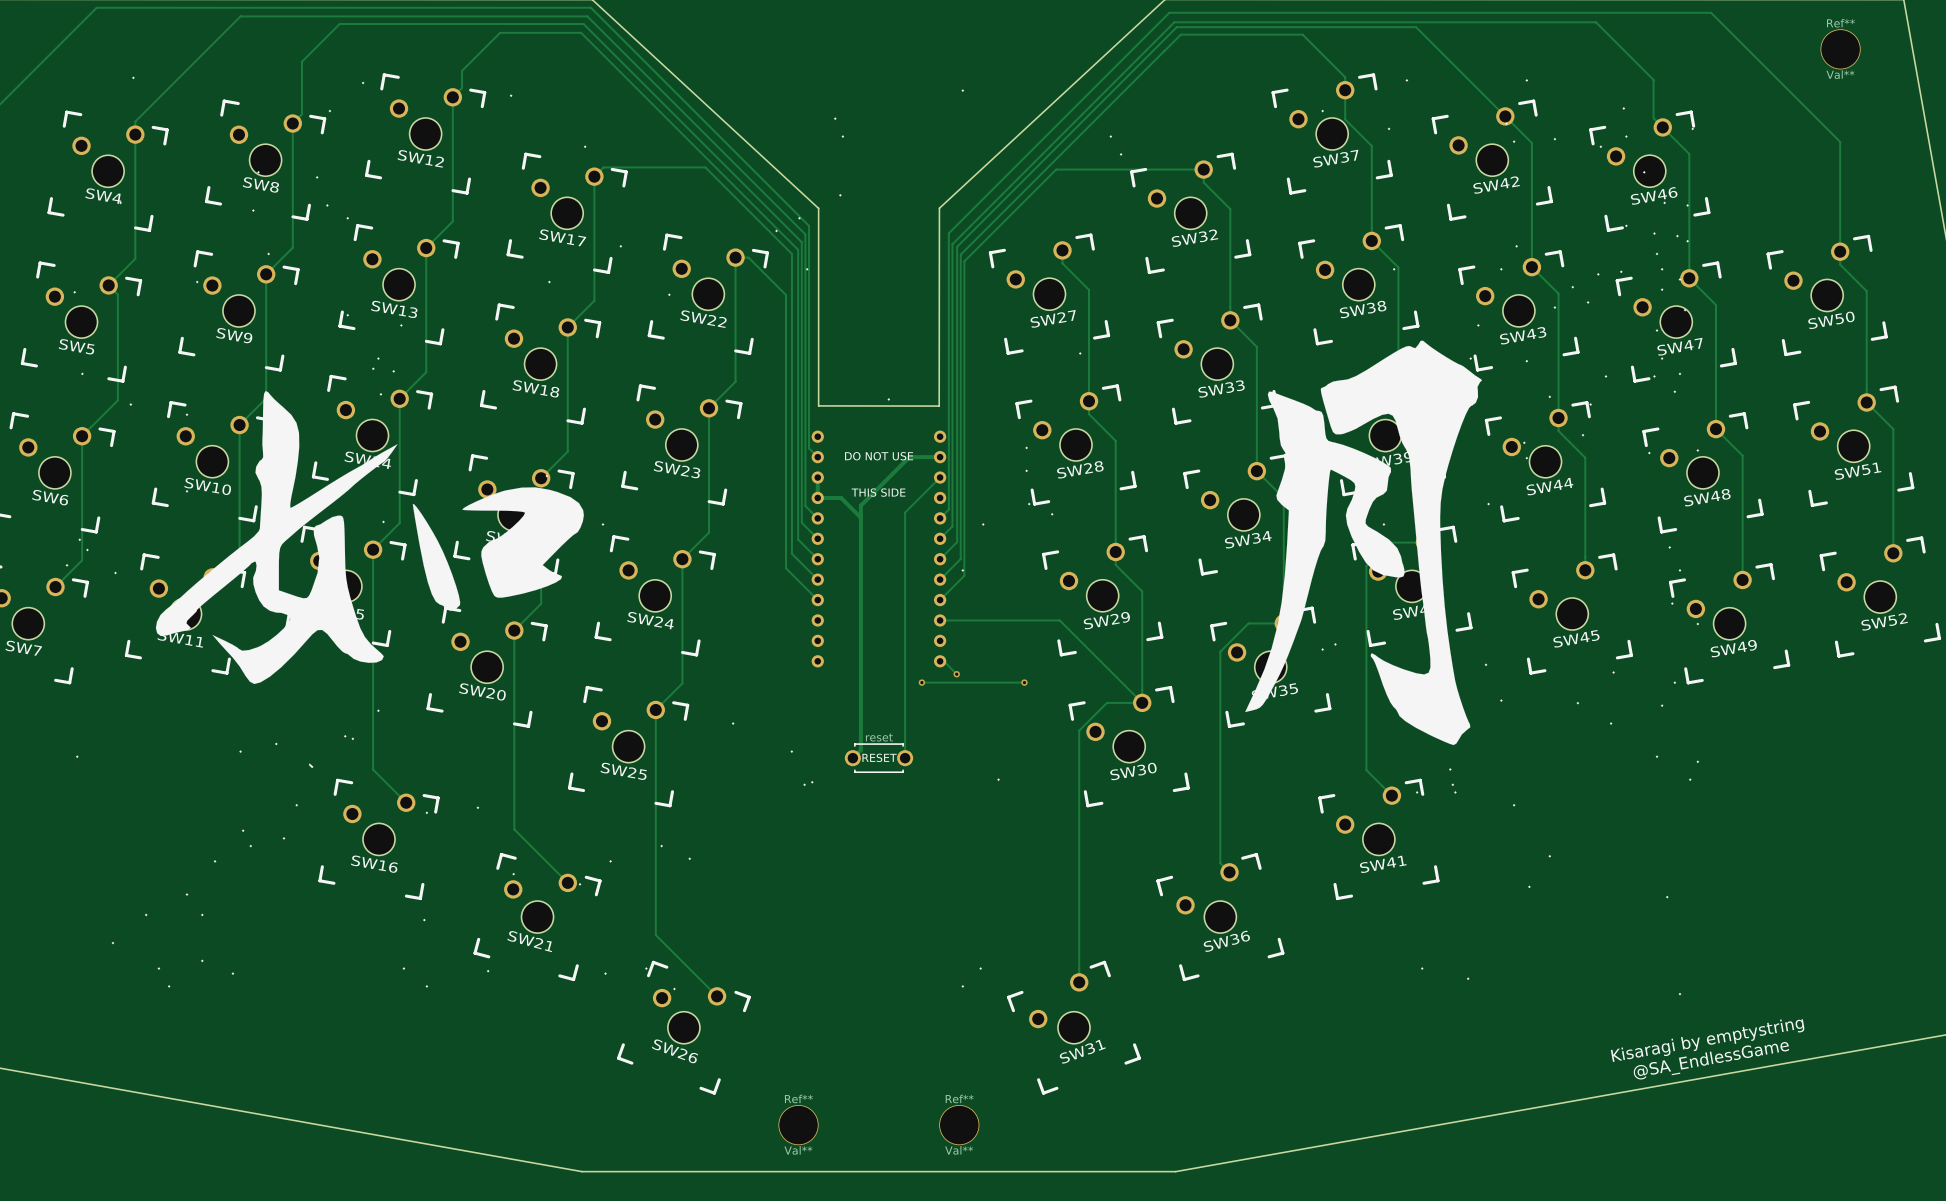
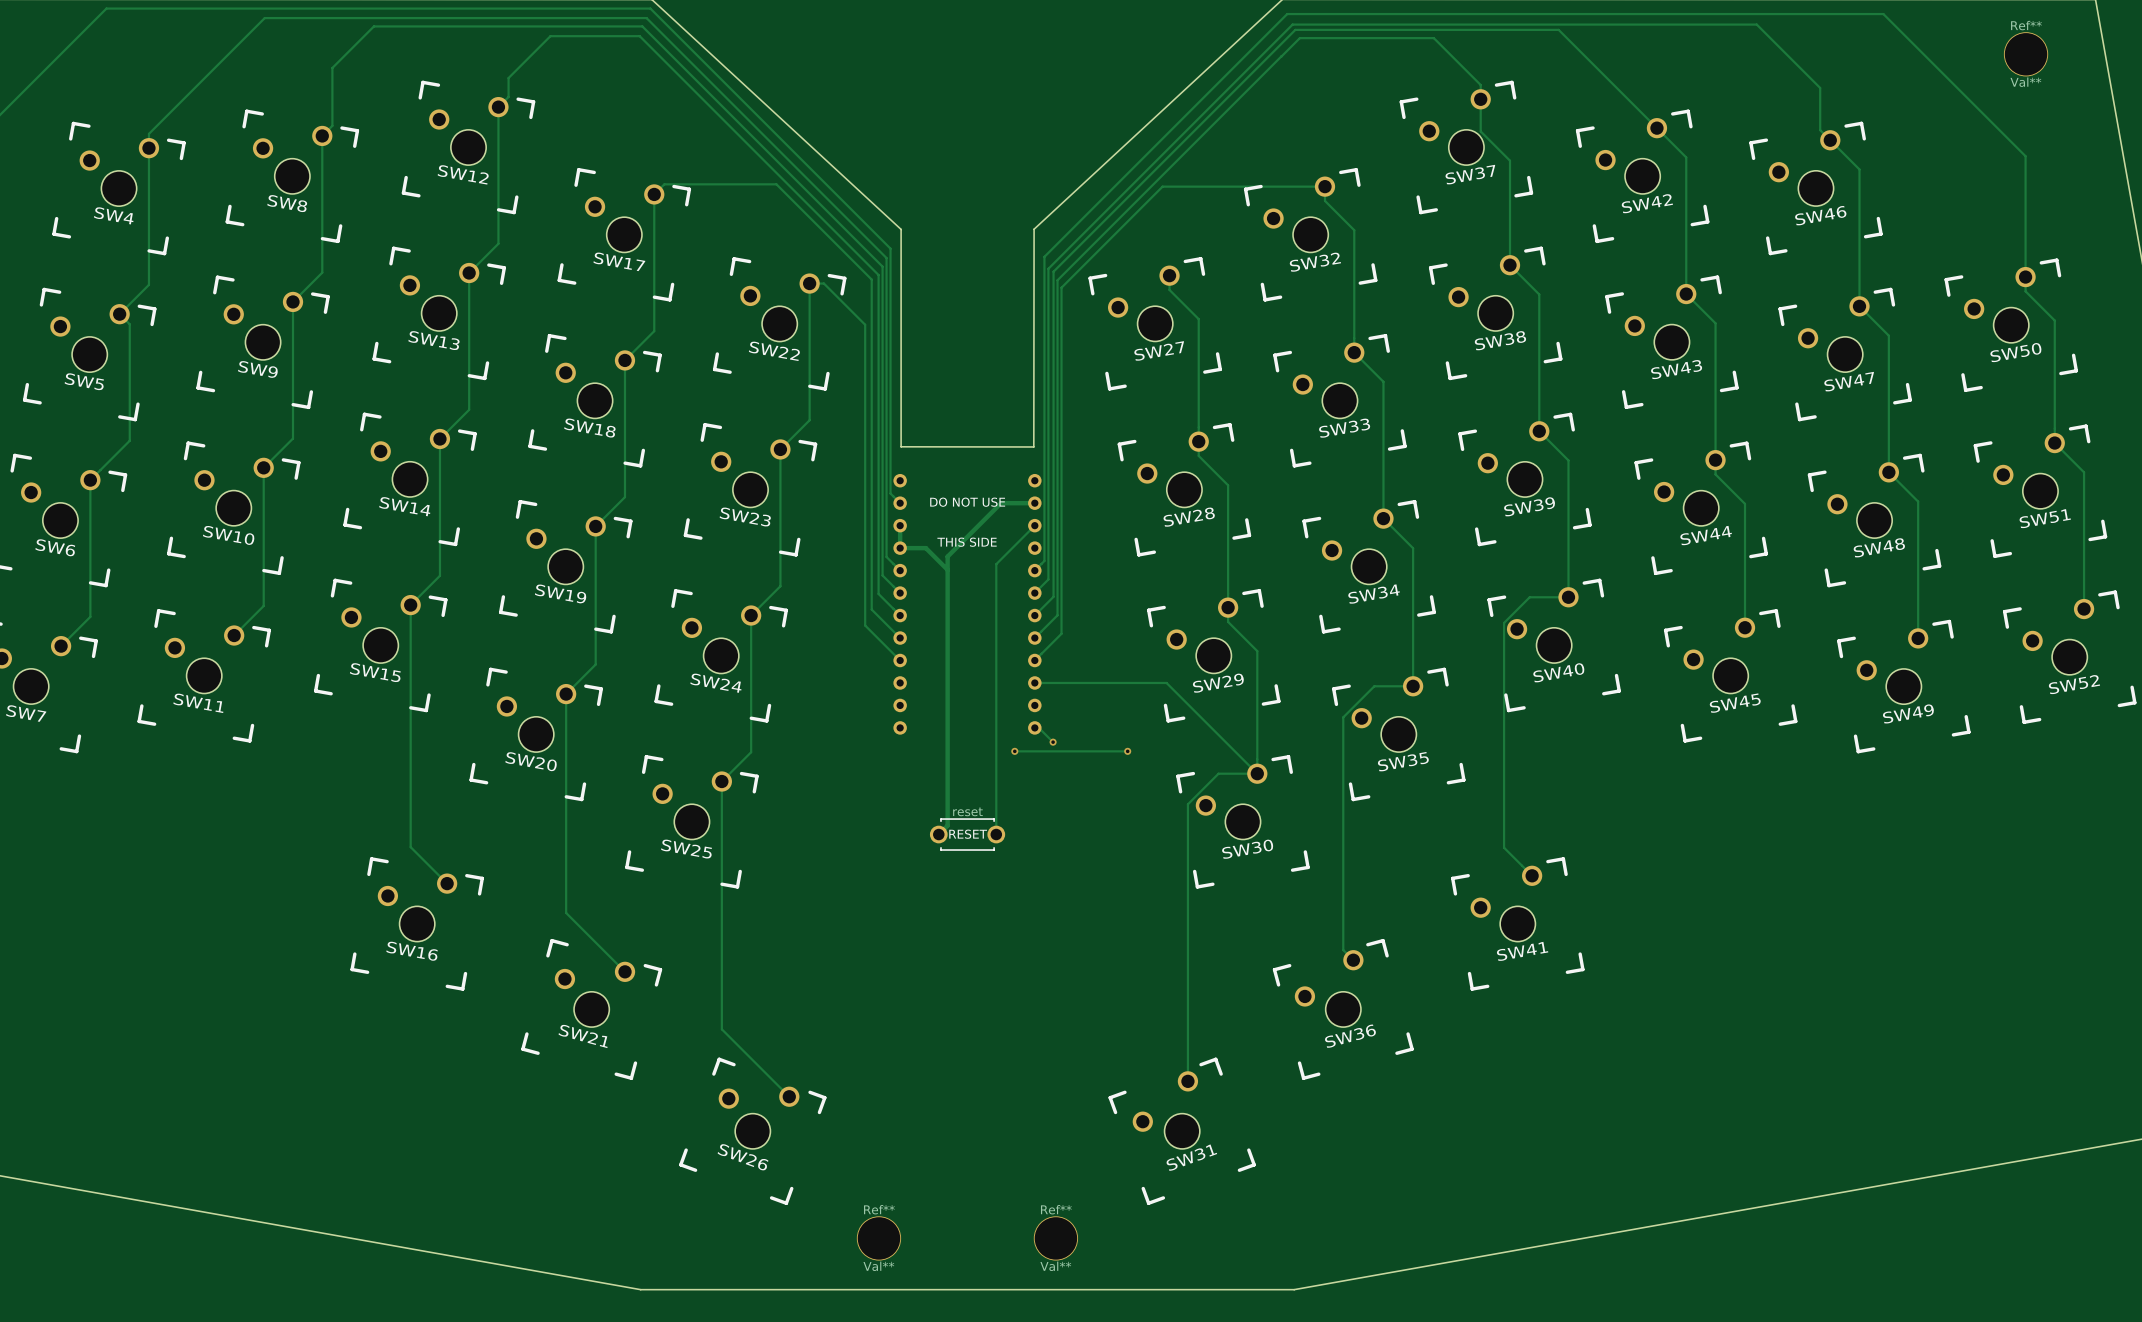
drawing: [65, 76, 1700, 996] -> none
text: Kisaragi by emptystring (1707, 1040) -> none
text: @SA_EndlessGame (1711, 1060) -> none

